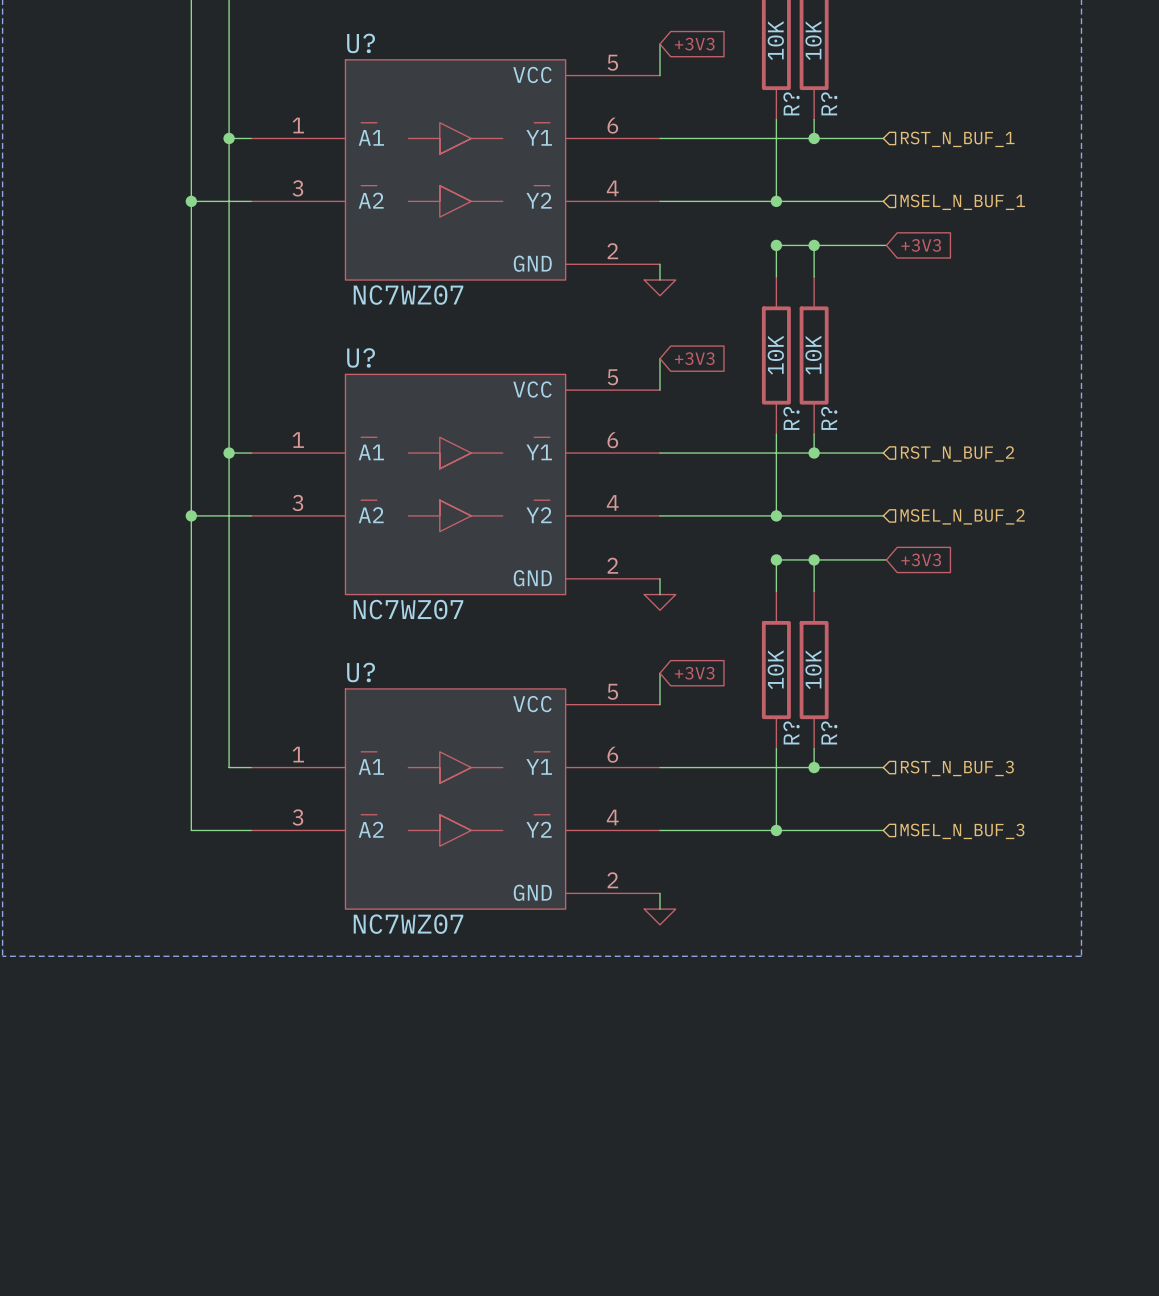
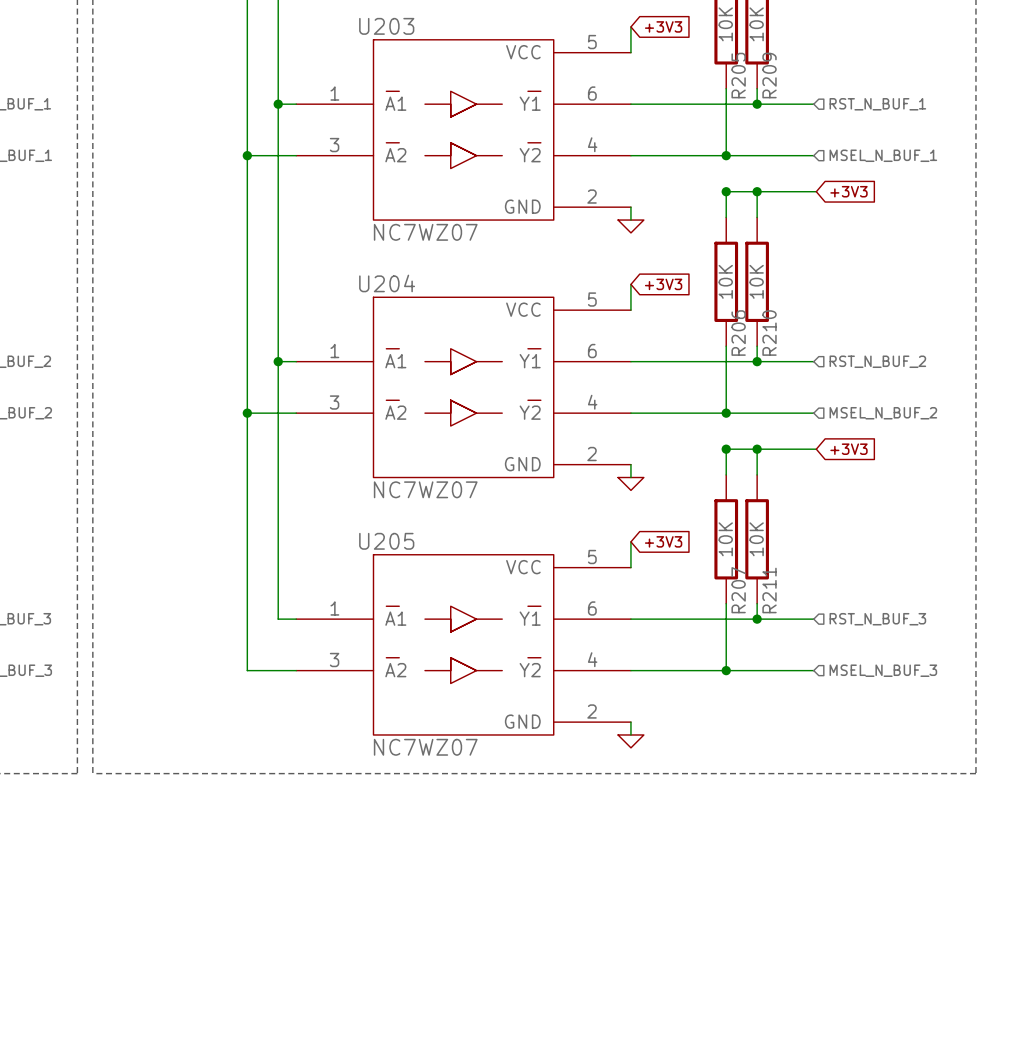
U? name: U? (361, 43) -> U203 (386, 26)
R? name: R? (791, 103) -> R205 (738, 75)
R? name: R? (829, 103) -> R209 (769, 75)
U? name: U? (361, 357) -> U204 (387, 283)
R? name: R? (791, 418) -> R206 (738, 333)
R? name: R? (829, 418) -> R210 (769, 333)
U? name: U? (361, 672) -> U205 (386, 541)
R? name: R? (791, 732) -> R207 (738, 590)
R? name: R? (829, 732) -> R211 (769, 590)

